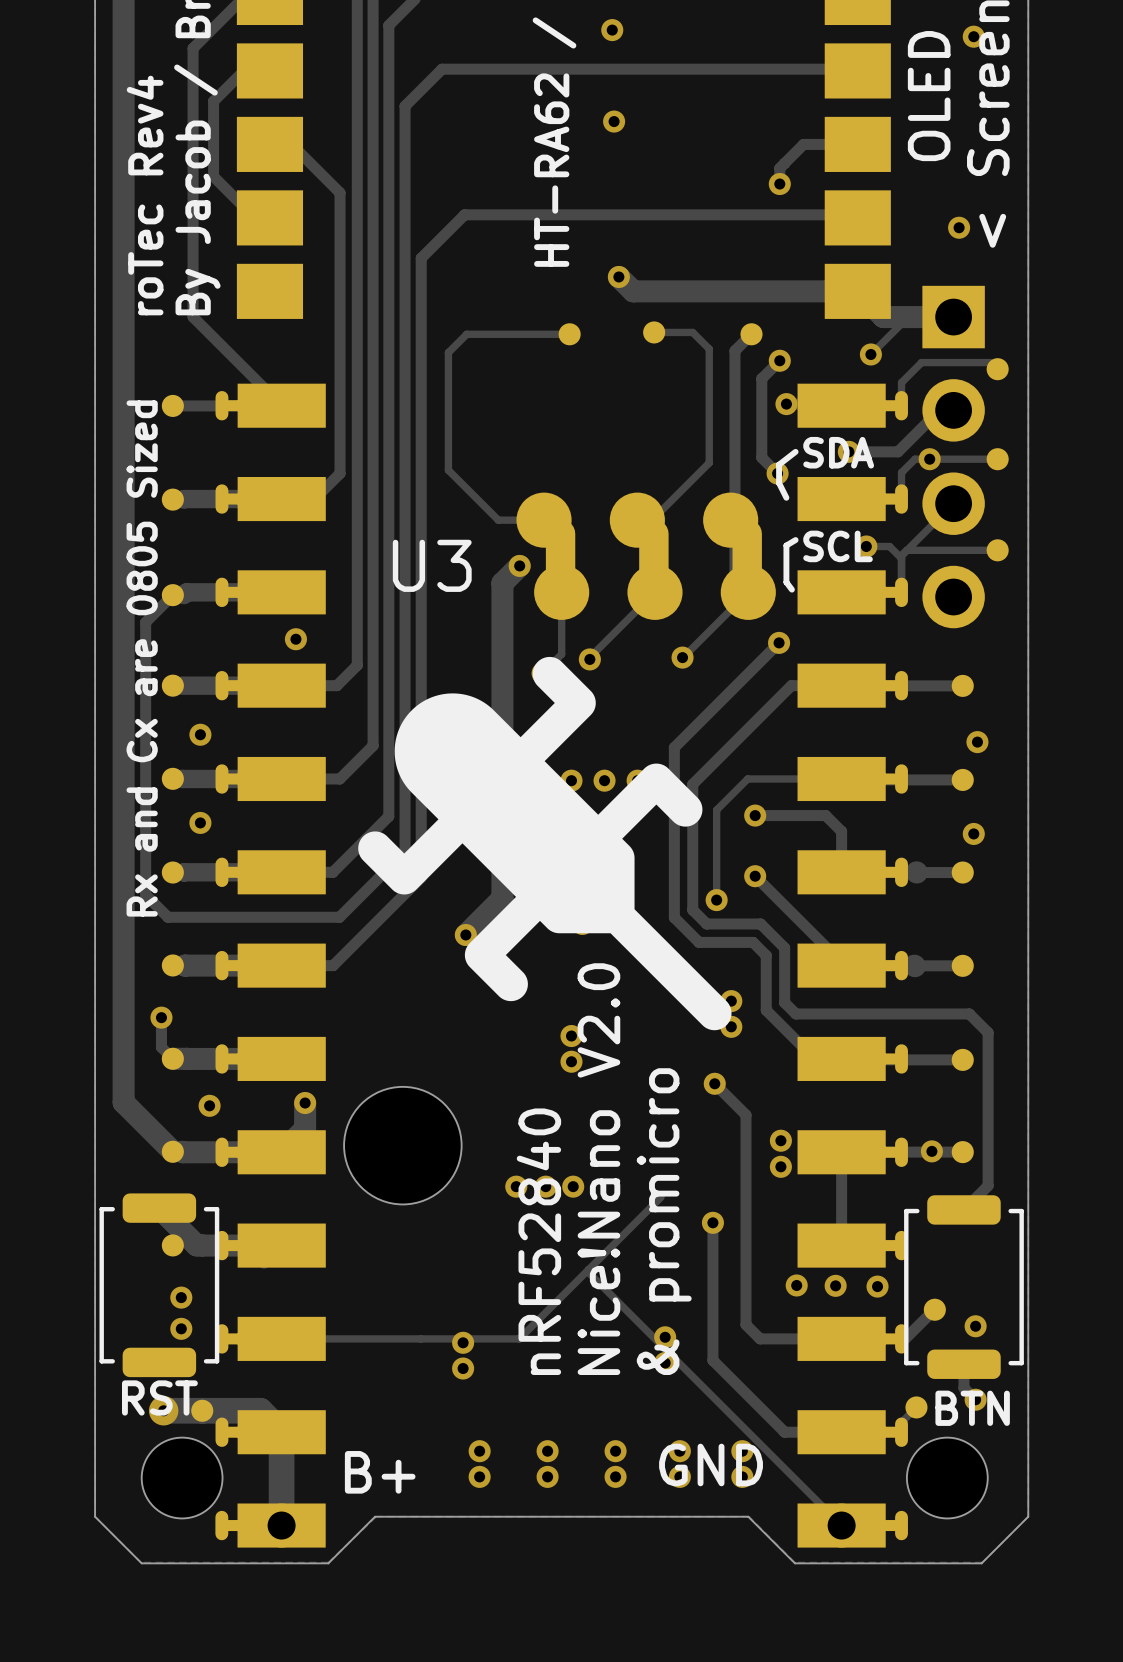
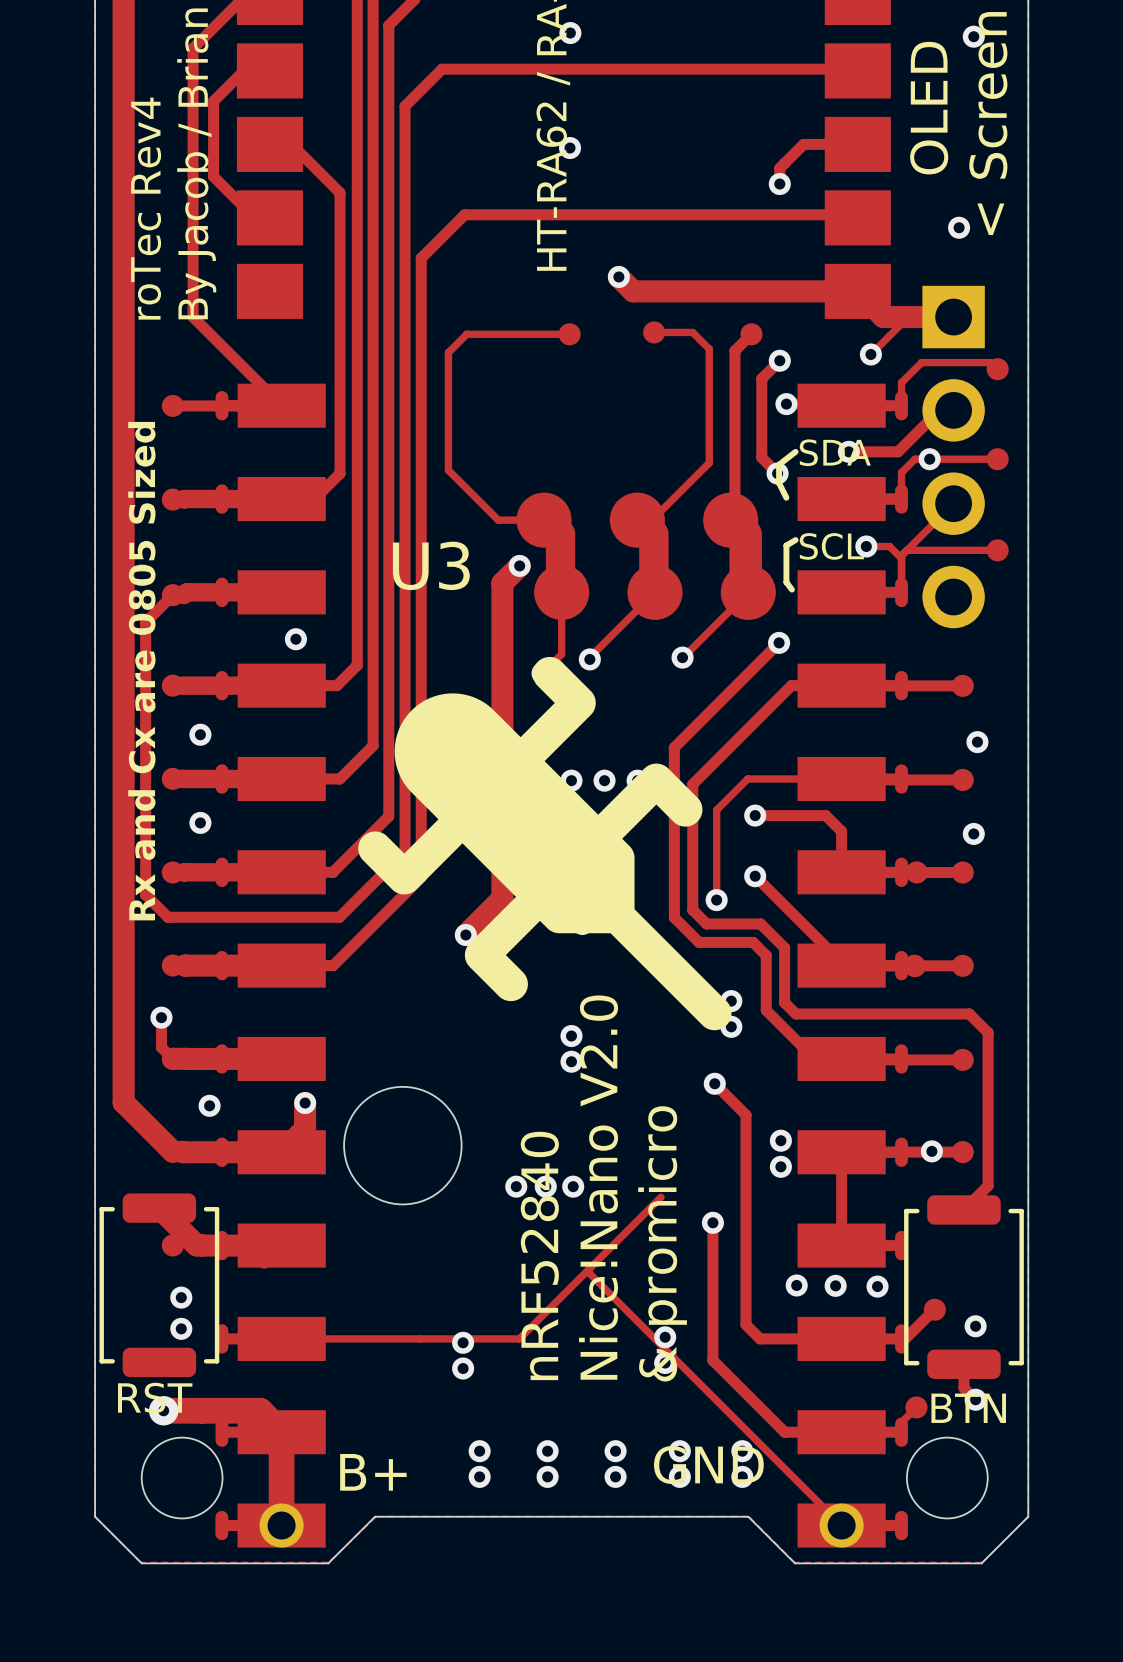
via: (612, 30) -> none
via: none -> (570, 33)
via: (614, 121) -> none
via: none -> (570, 148)

